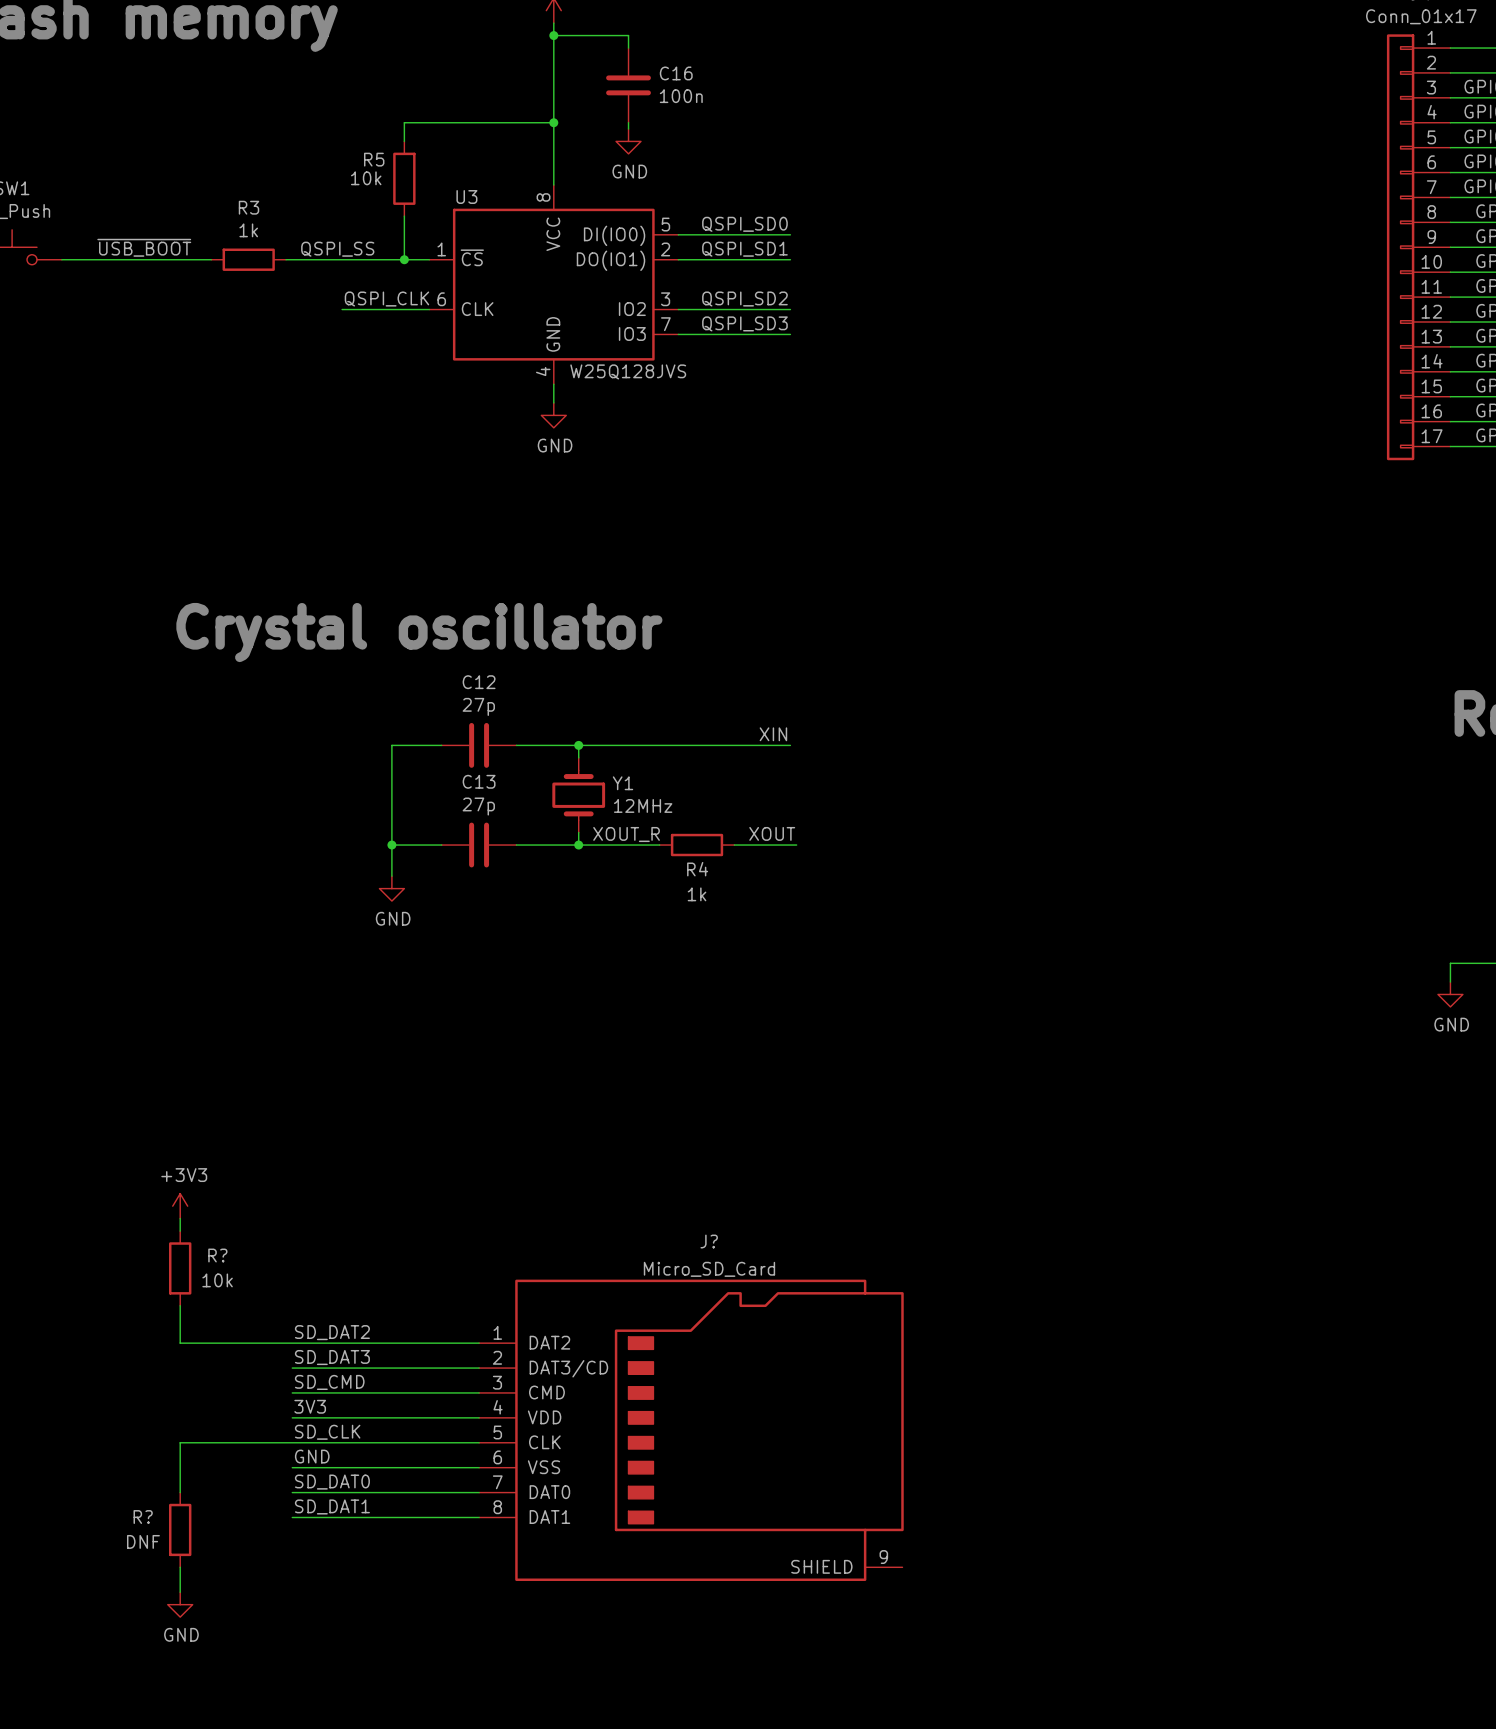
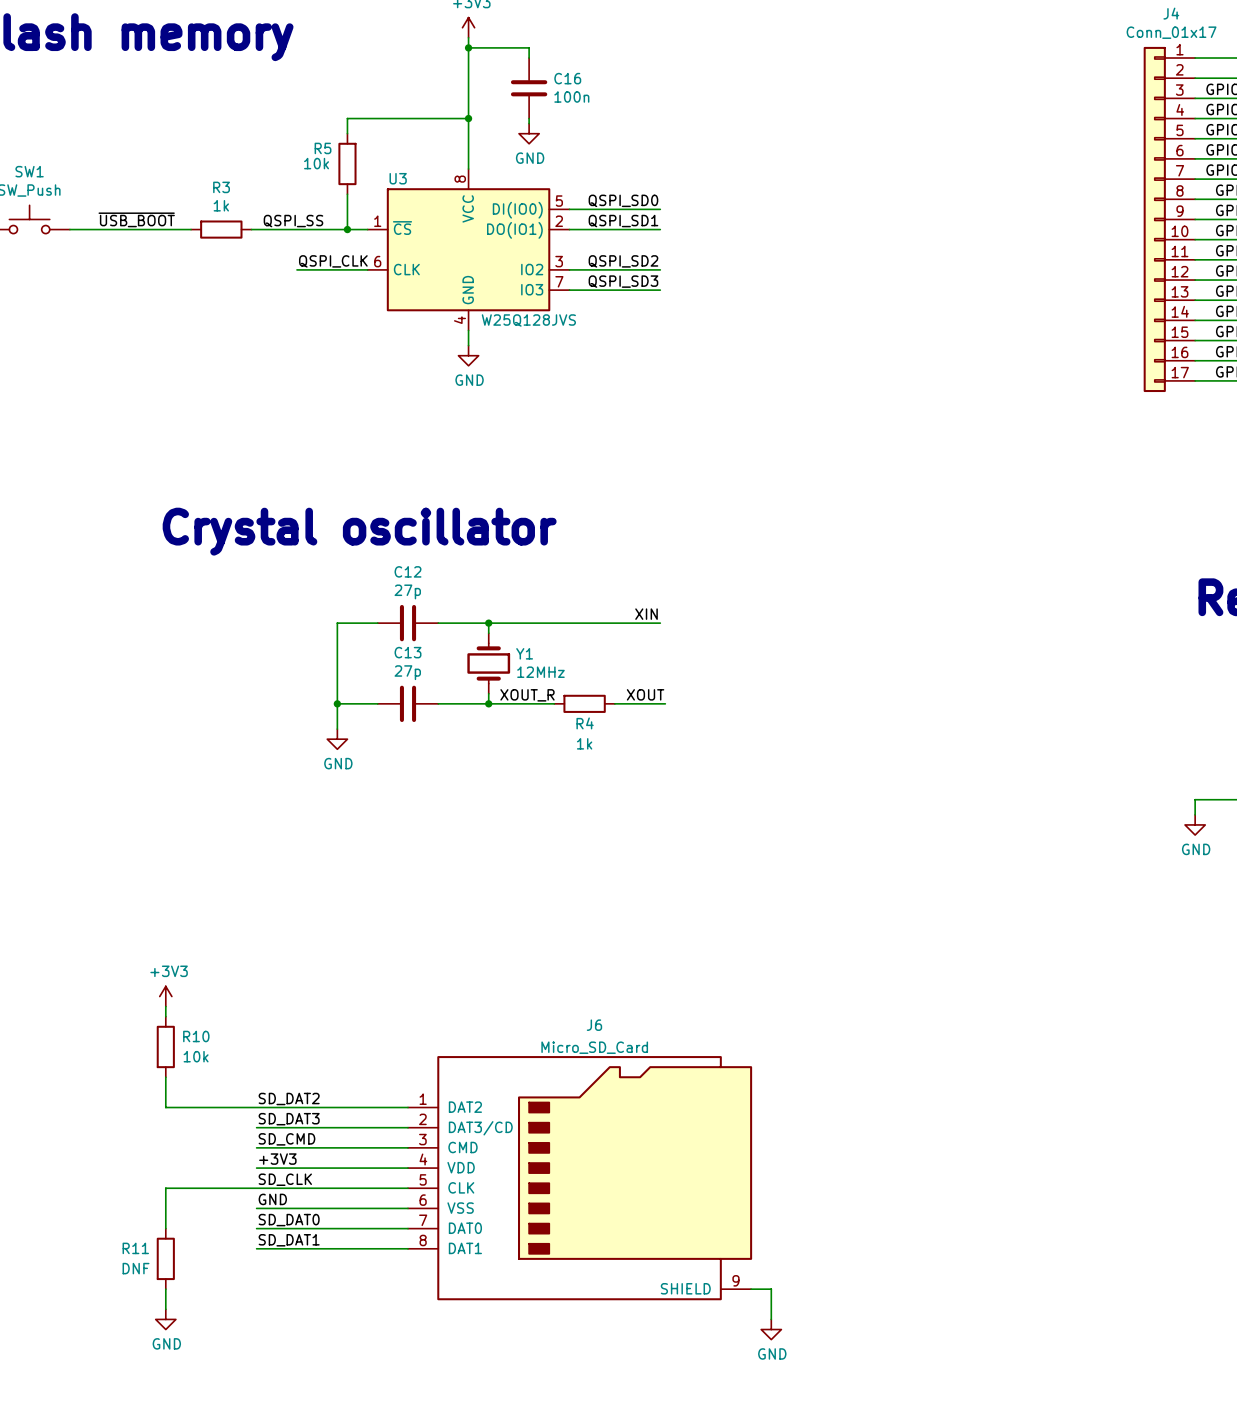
J? name: J? (709, 1241) -> J6 (594, 1025)
R? name: R? (217, 1255) -> R10 (196, 1036)
label: 3V3 (310, 1406) -> +3V3 (277, 1159)
R? name: R? (143, 1517) -> R11 (135, 1248)
wire: none -> (751, 1289) (771, 1289) (771, 1319)
power symbol: none -> GND (771, 1329)

